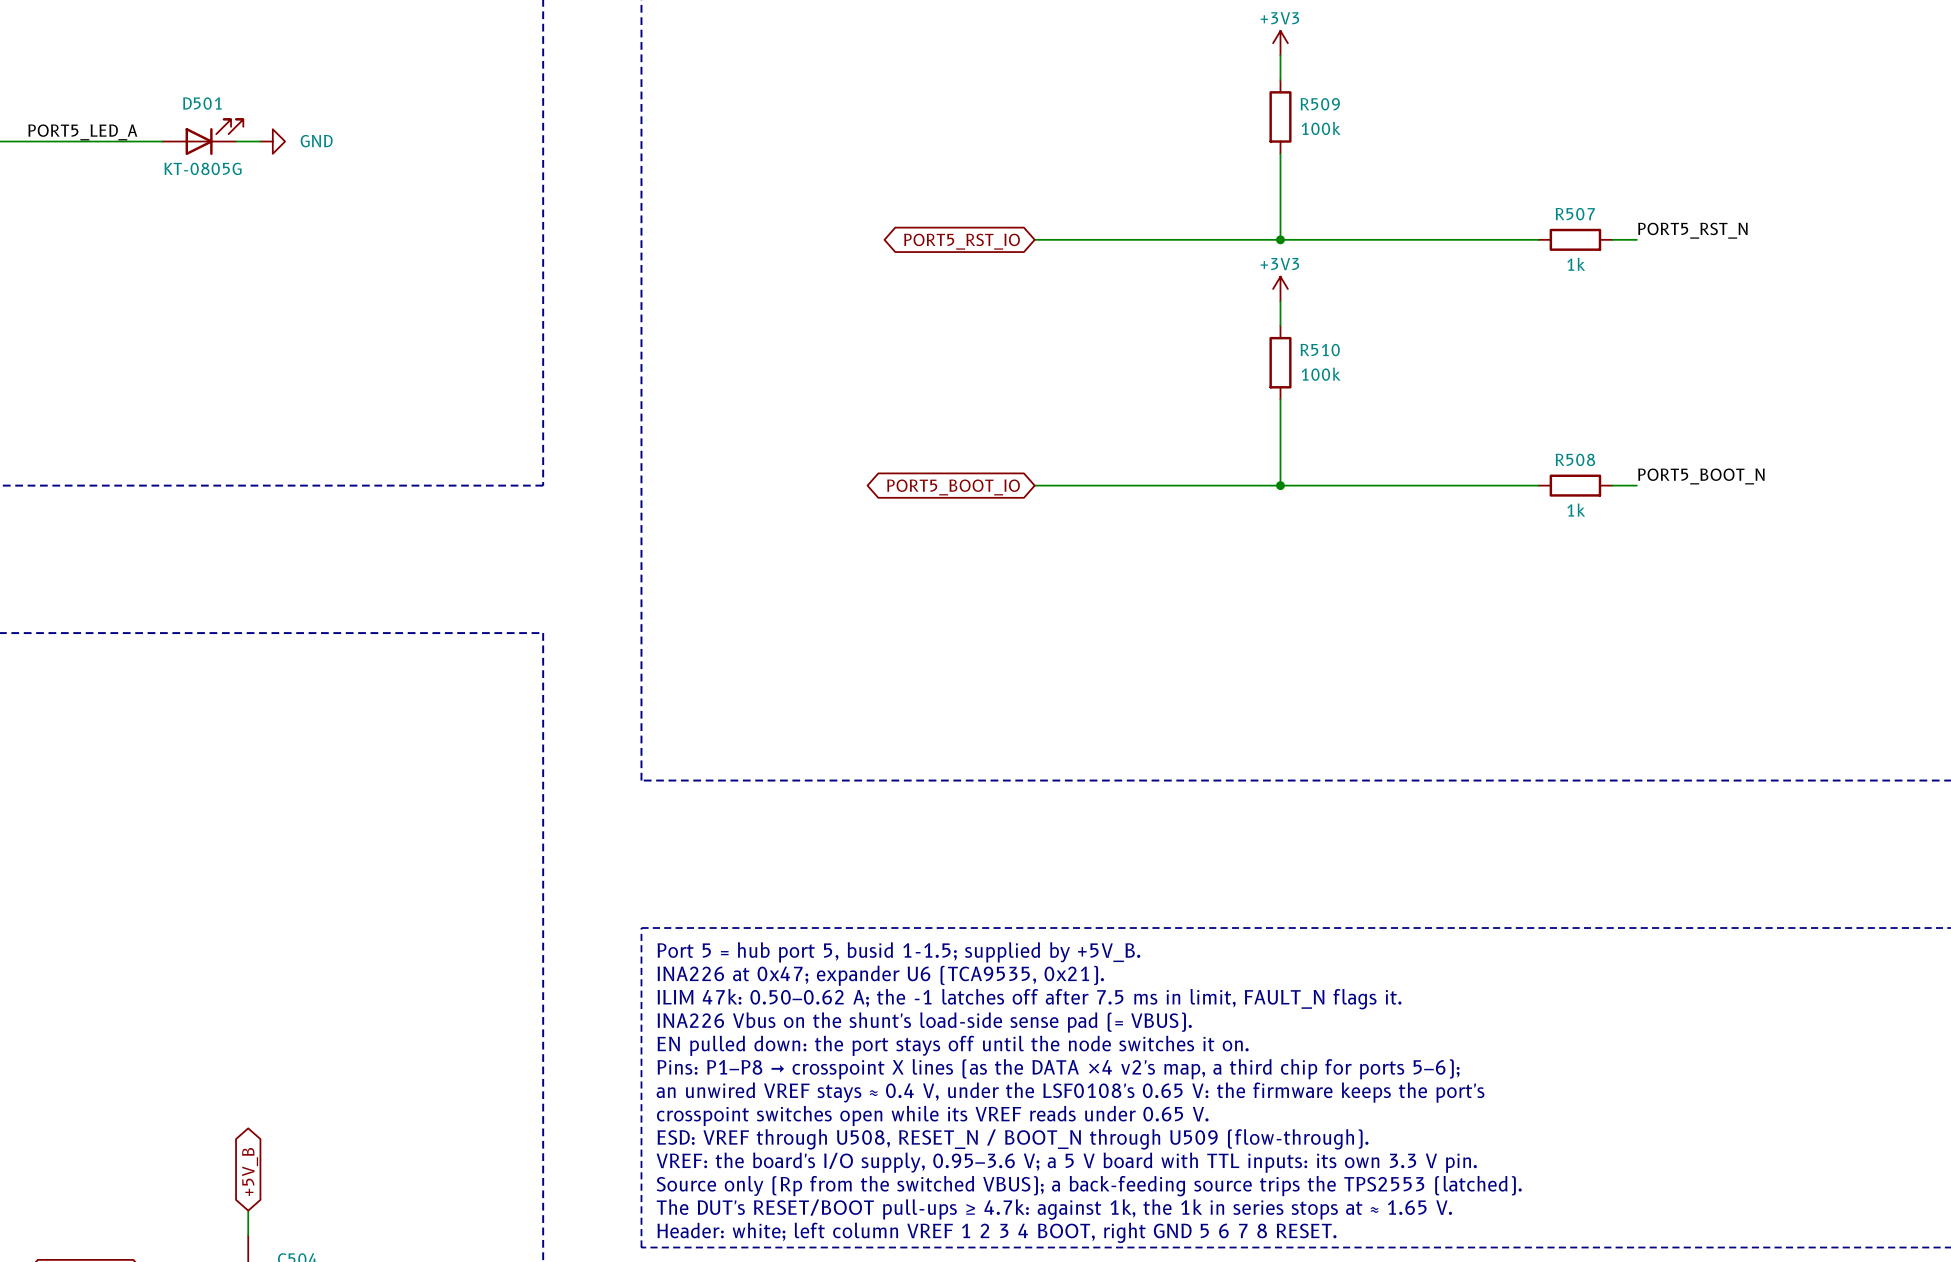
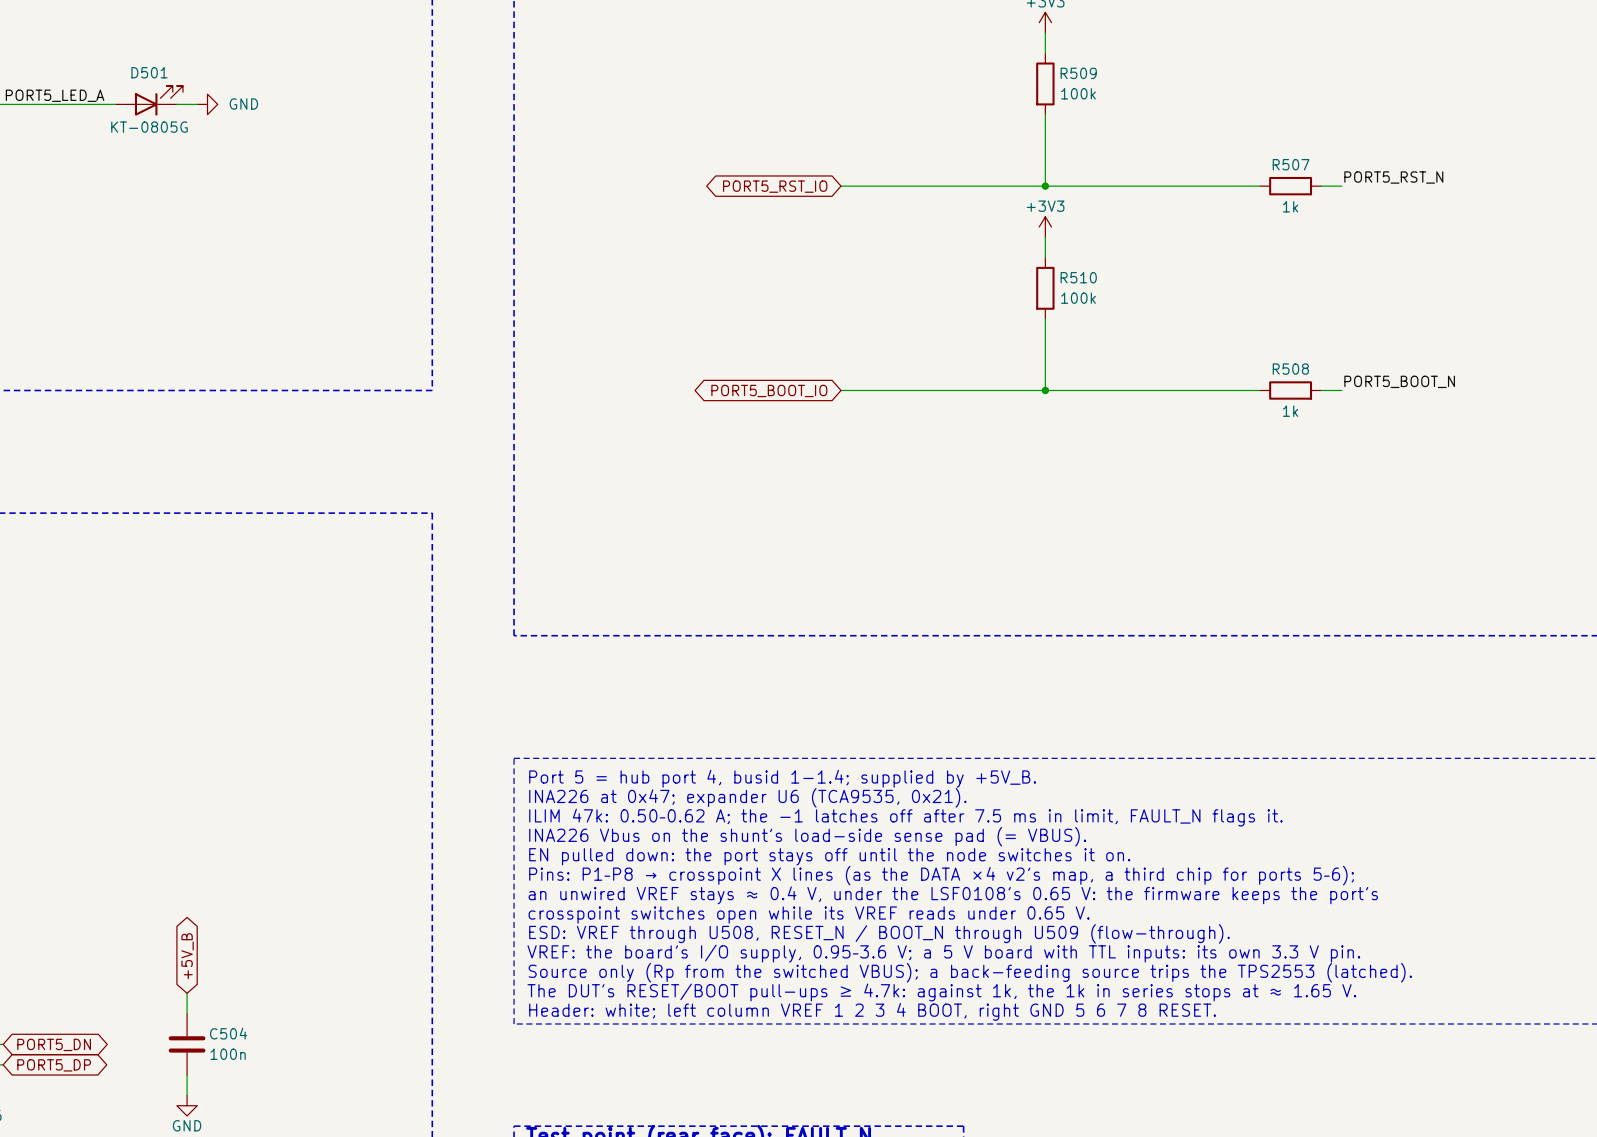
text: Port 5 = hub port 5, busid 1-1.5; supplied by +5V_B. (898, 952) -> Port 5 = hub port 4, busid 1-1.4; supplied by +5V_B. (782, 778)

